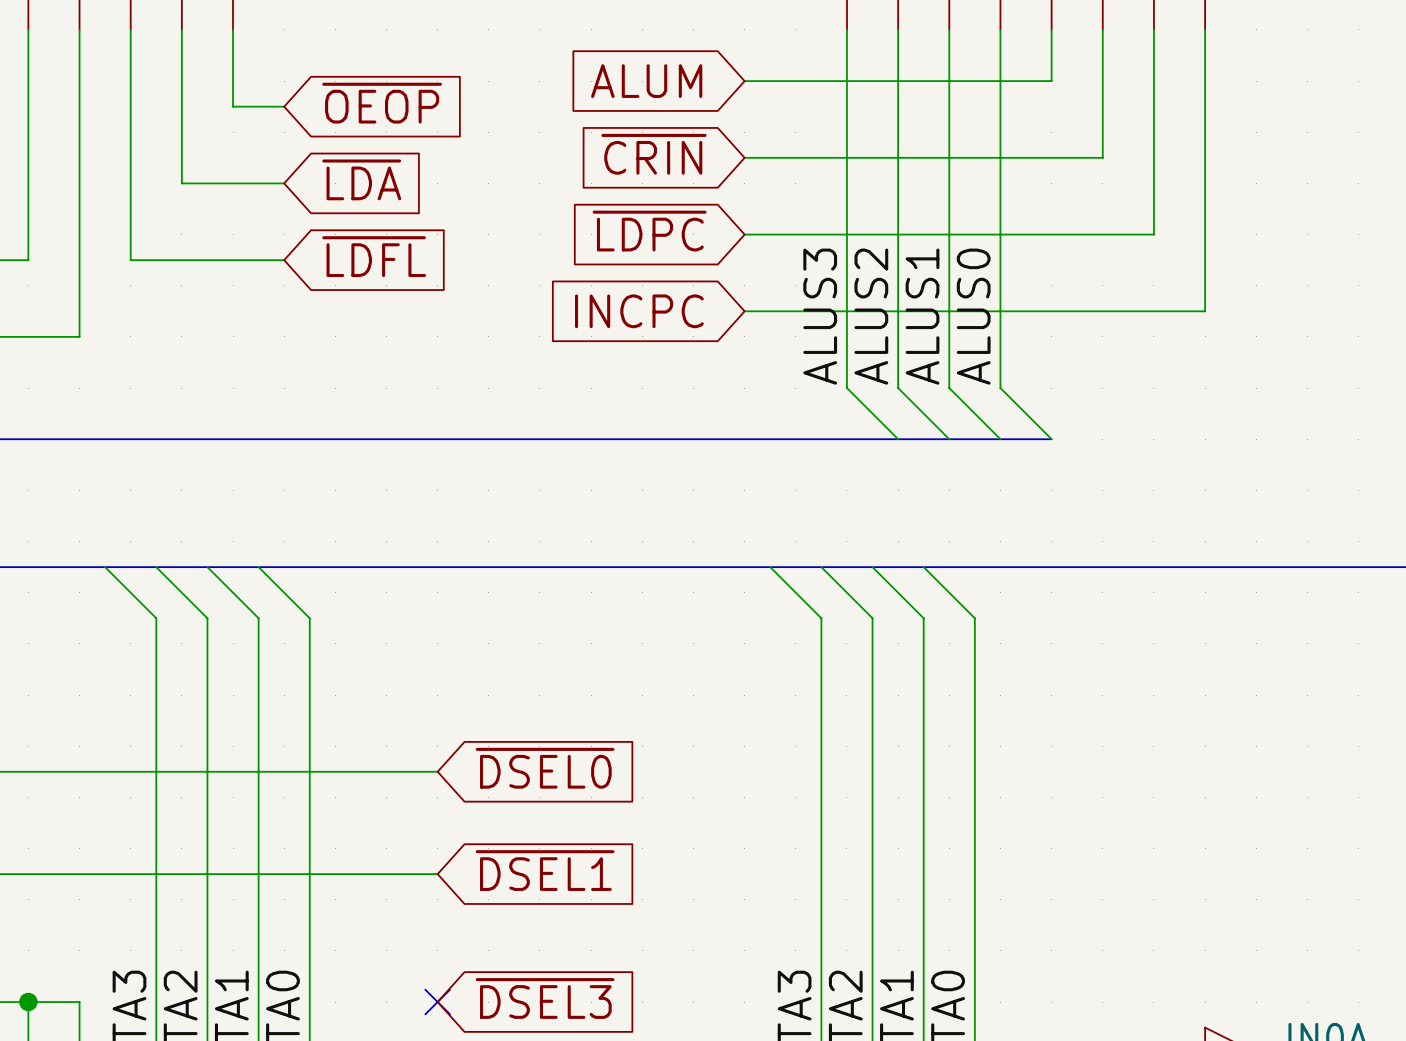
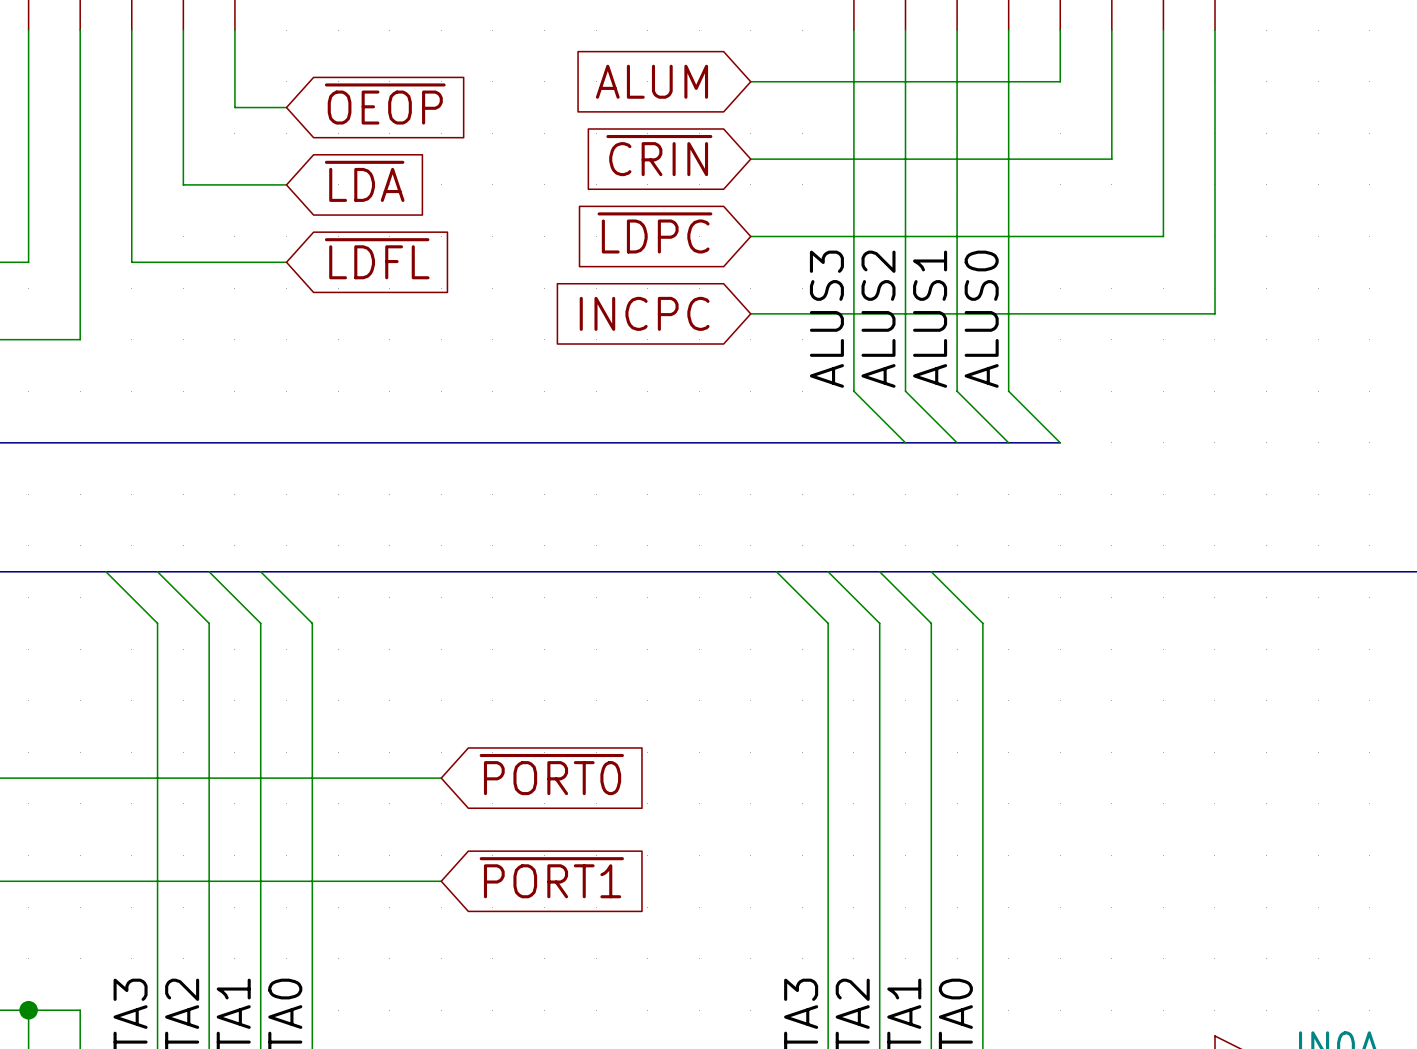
global label: ~{DSEL0} (545, 768) -> ~{PORT0} (551, 774)
global label: ~{DSEL1} (545, 870) -> ~{PORT1} (551, 877)
global label: ~{DSEL3} (545, 998) -> none
no-connect mark: (437, 1002) -> none

